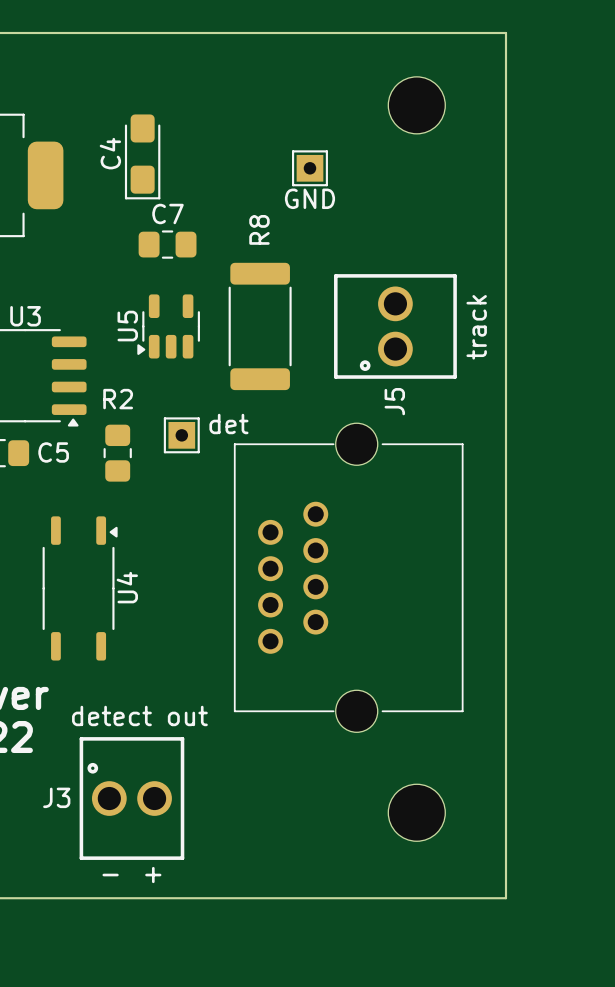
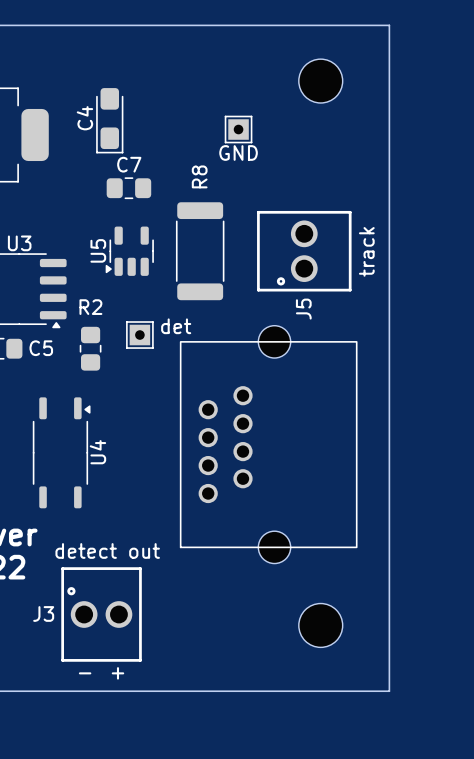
part footprint: [233, 423, 464, 733] -> [179, 325, 358, 564]

